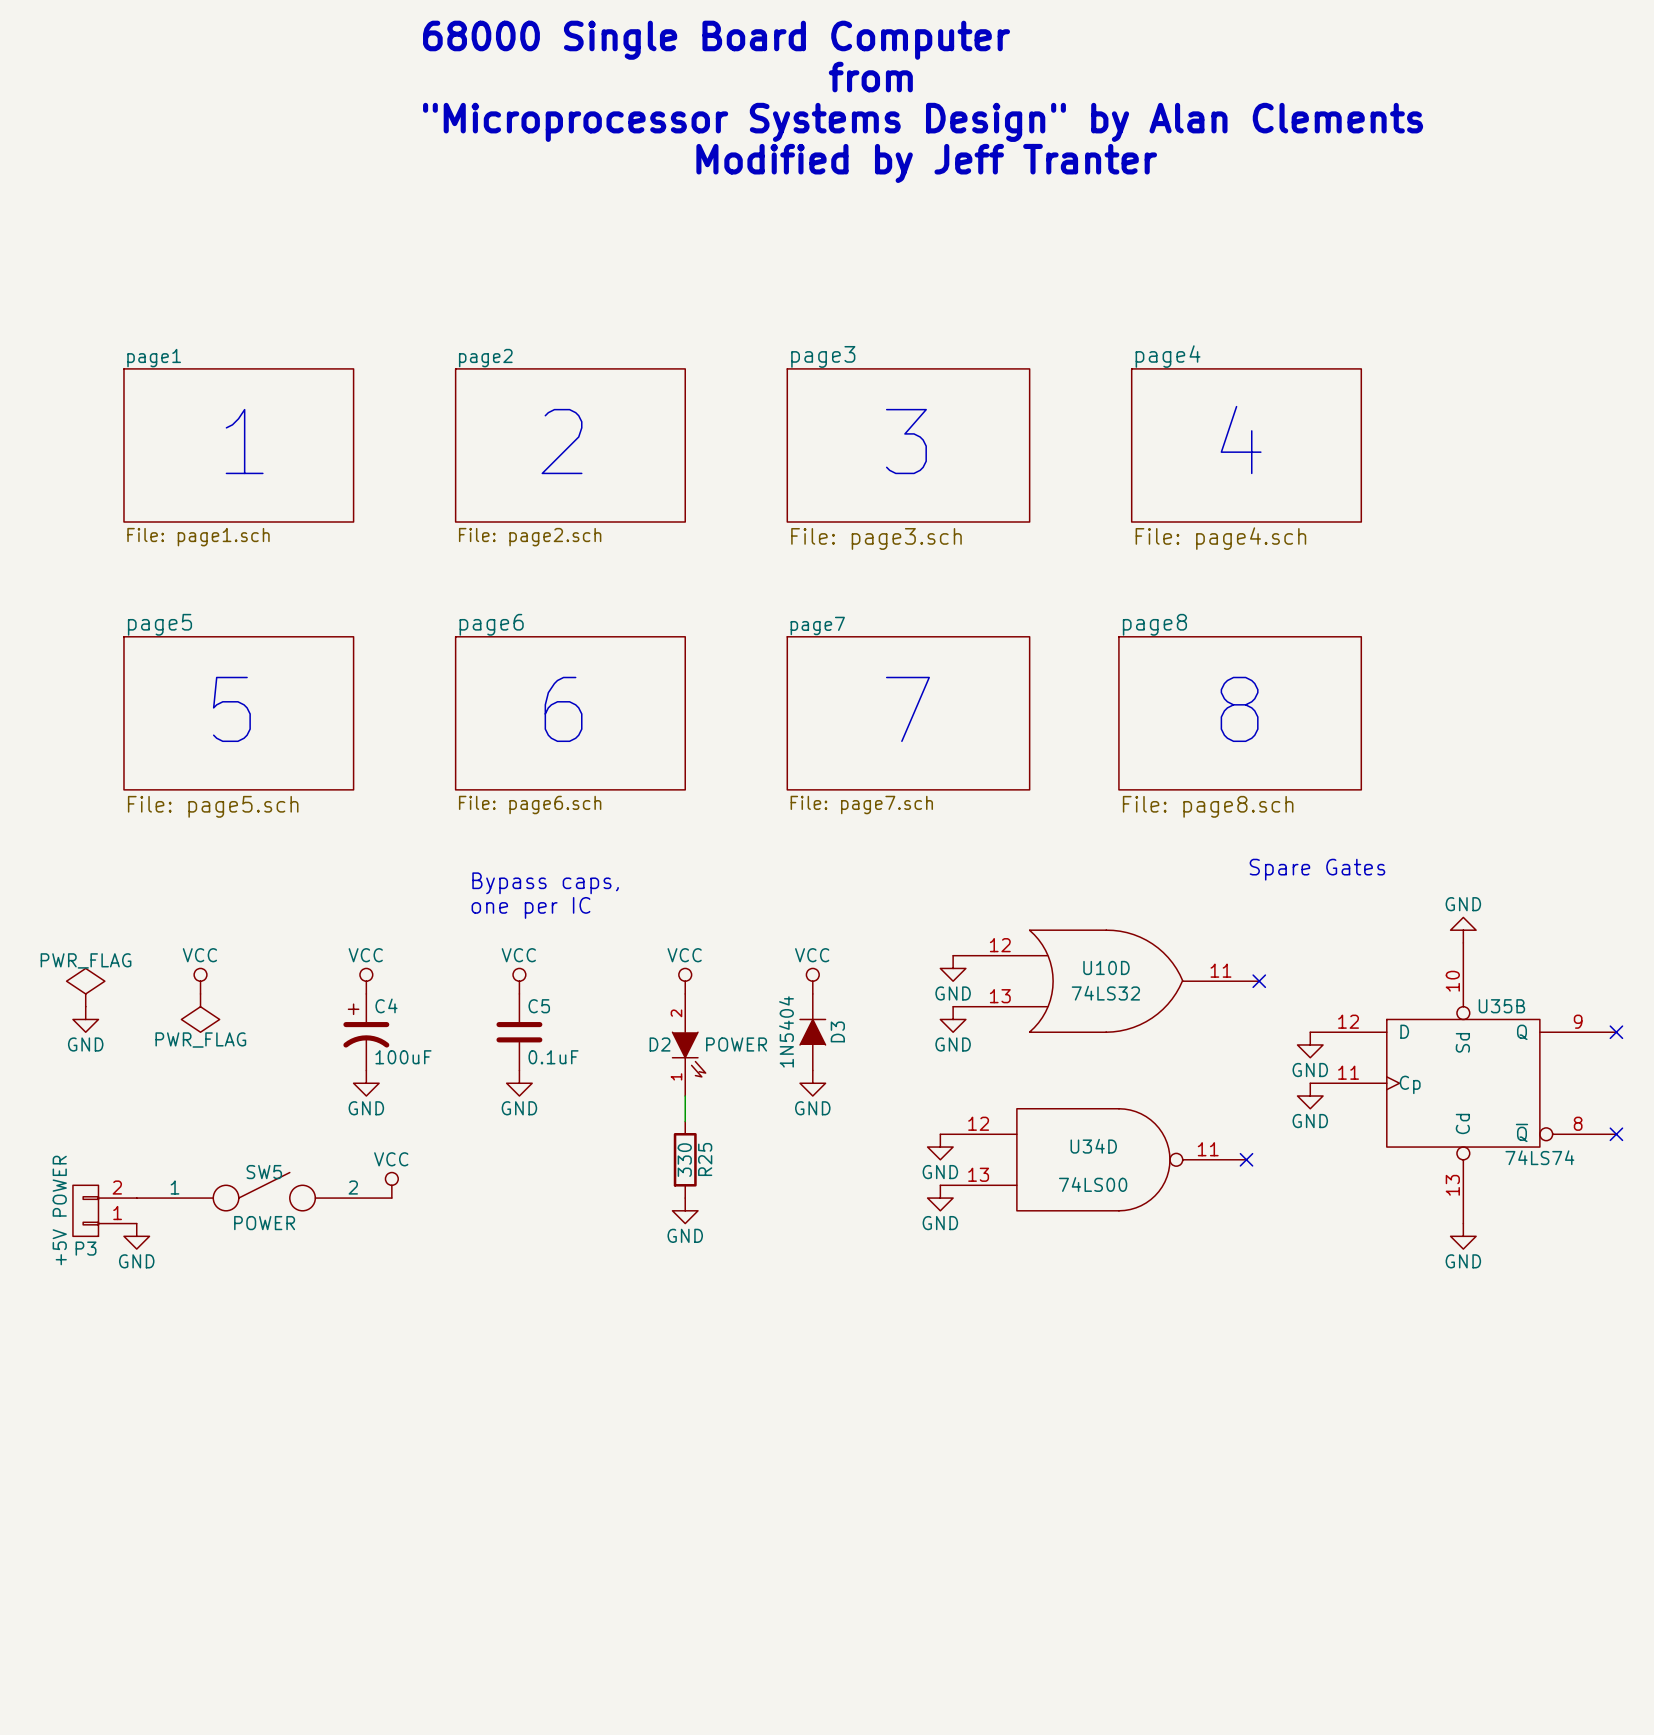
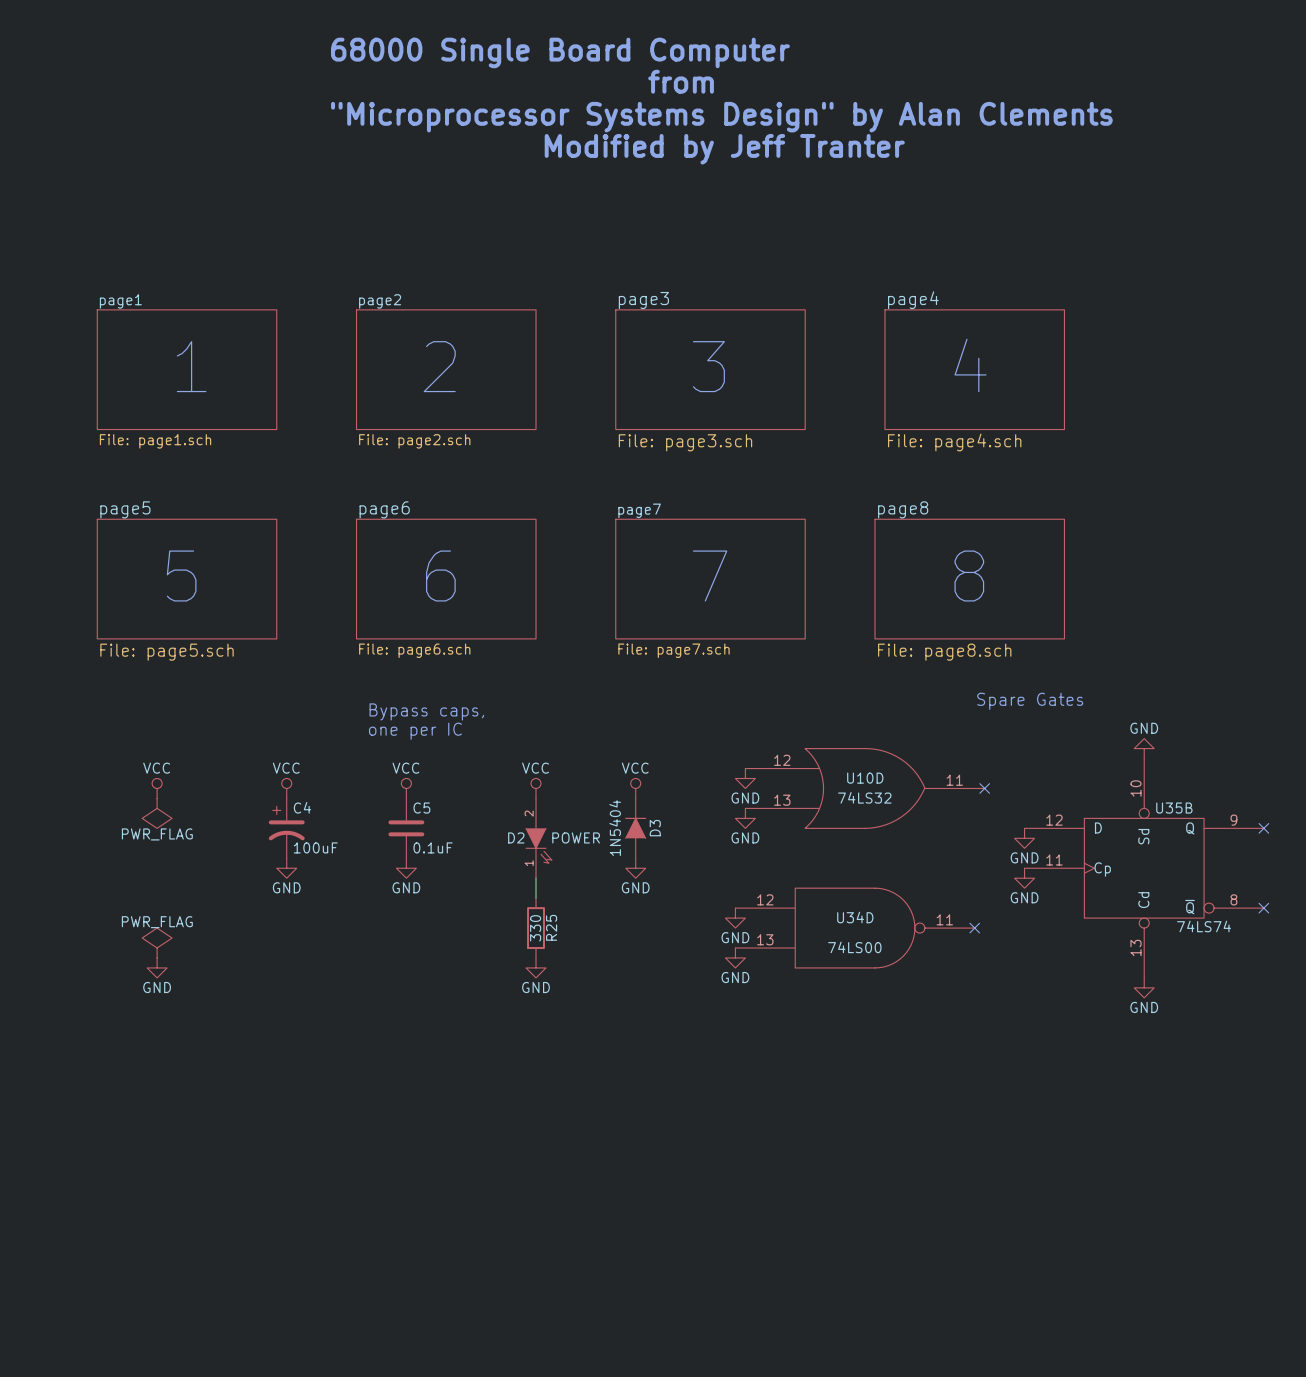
power symbol position: PWR_FLAG (85, 987) -> PWR_FLAG (157, 943)
power symbol: GND (85, 1019) -> none
power symbol: VCC (391, 1185) -> none
SW5: POWER (264, 1191) -> none
P3: +5V POWER (104, 1210) -> none
power symbol position: GND (136, 1236) -> GND (157, 967)

